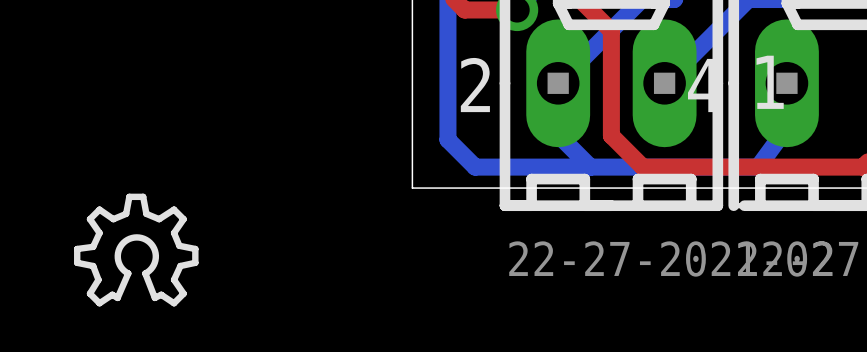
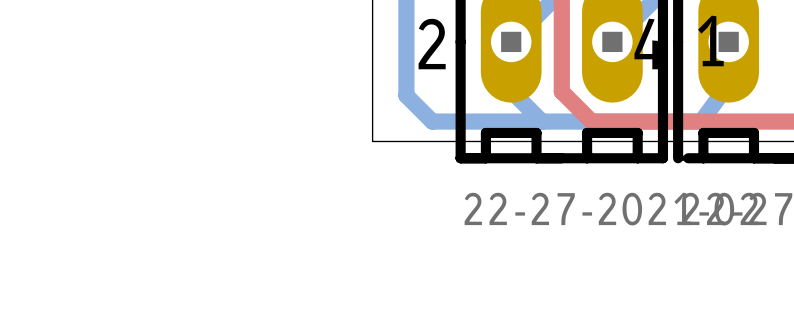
drawing: [74, 193, 199, 307] -> none

